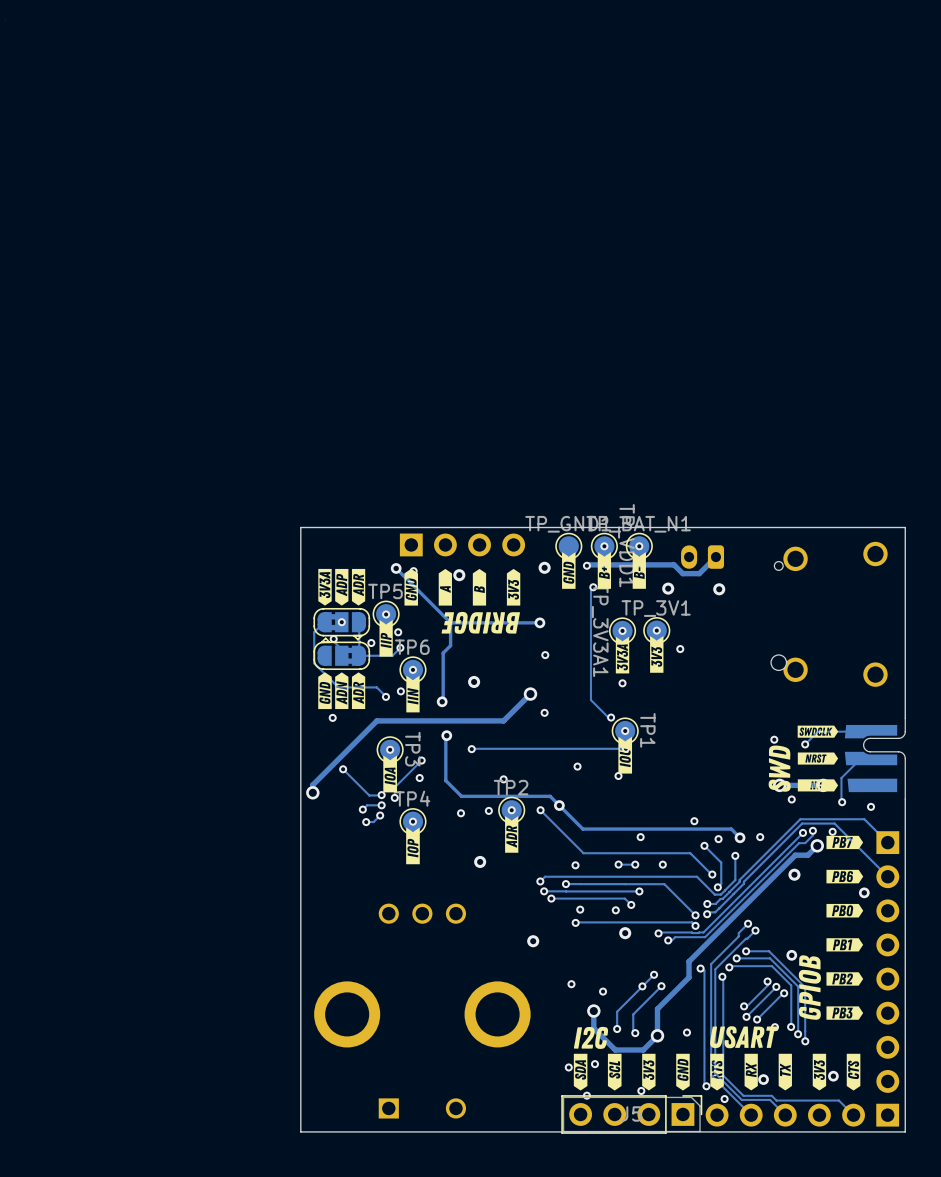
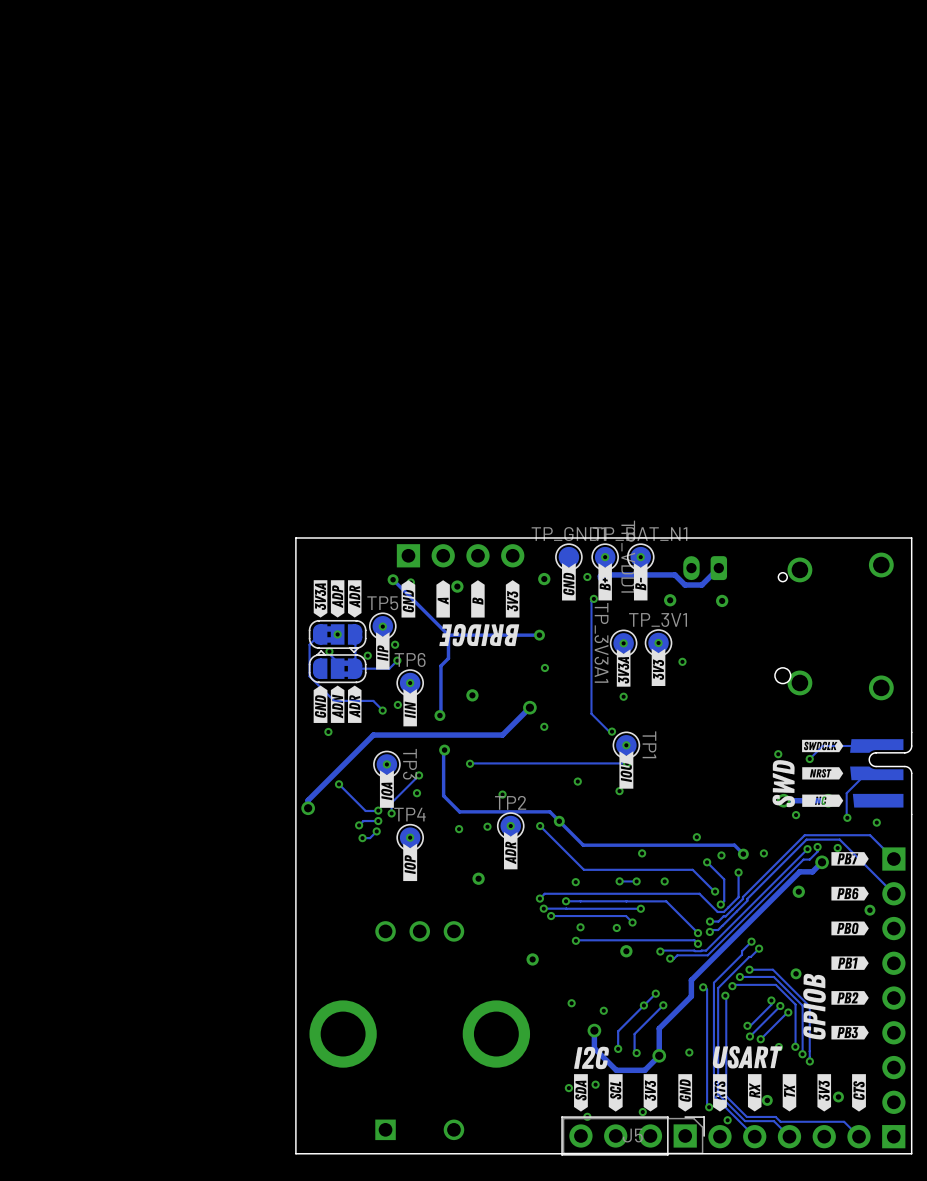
track: (674, 564) (586, 565) -> (676, 576) (601, 574) (600, 578)

